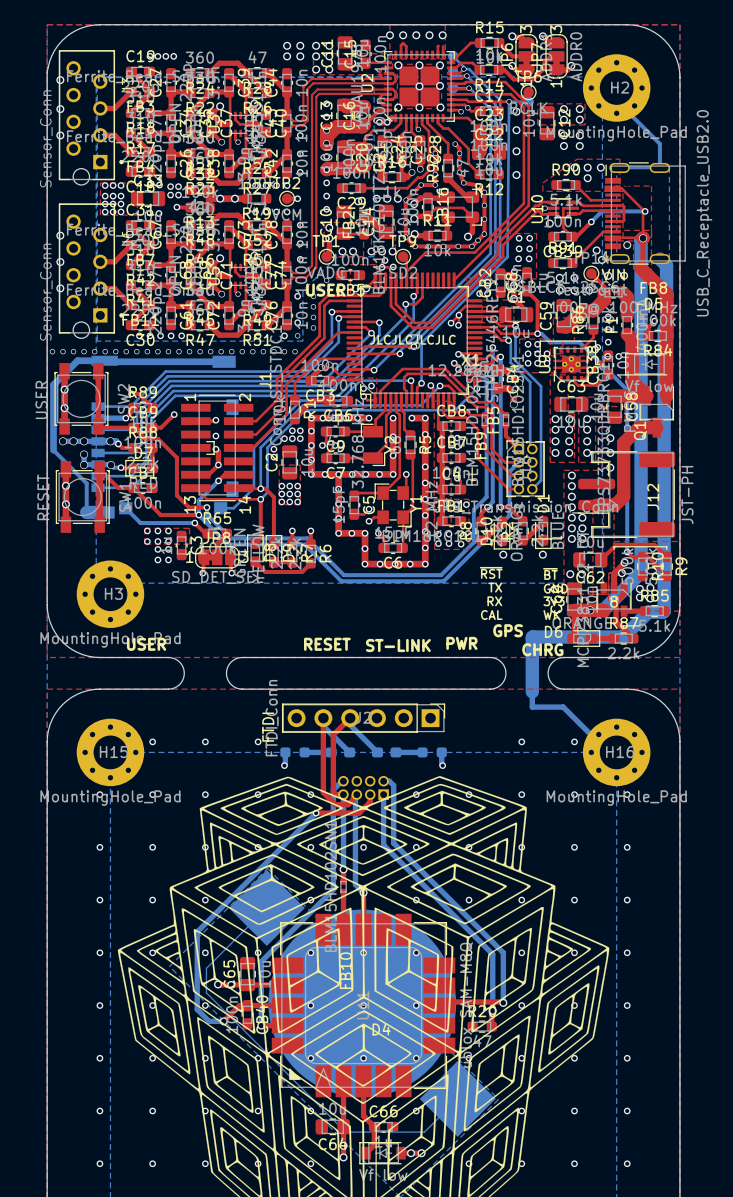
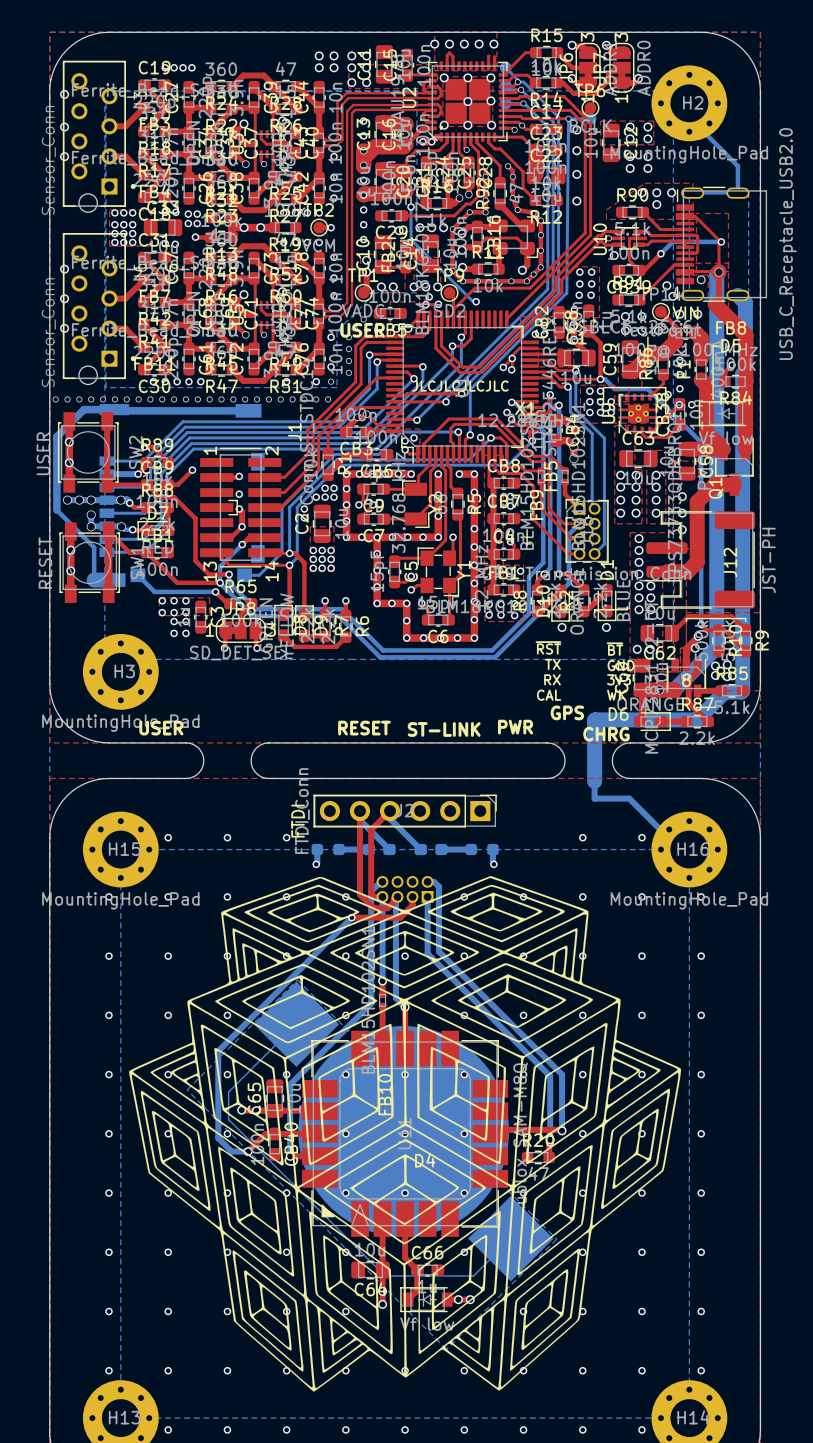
bottom track: none -> (411, 206) (411, 239) (473, 301) (476, 301)
via: none -> (411, 206)
via: none -> (476, 301)

